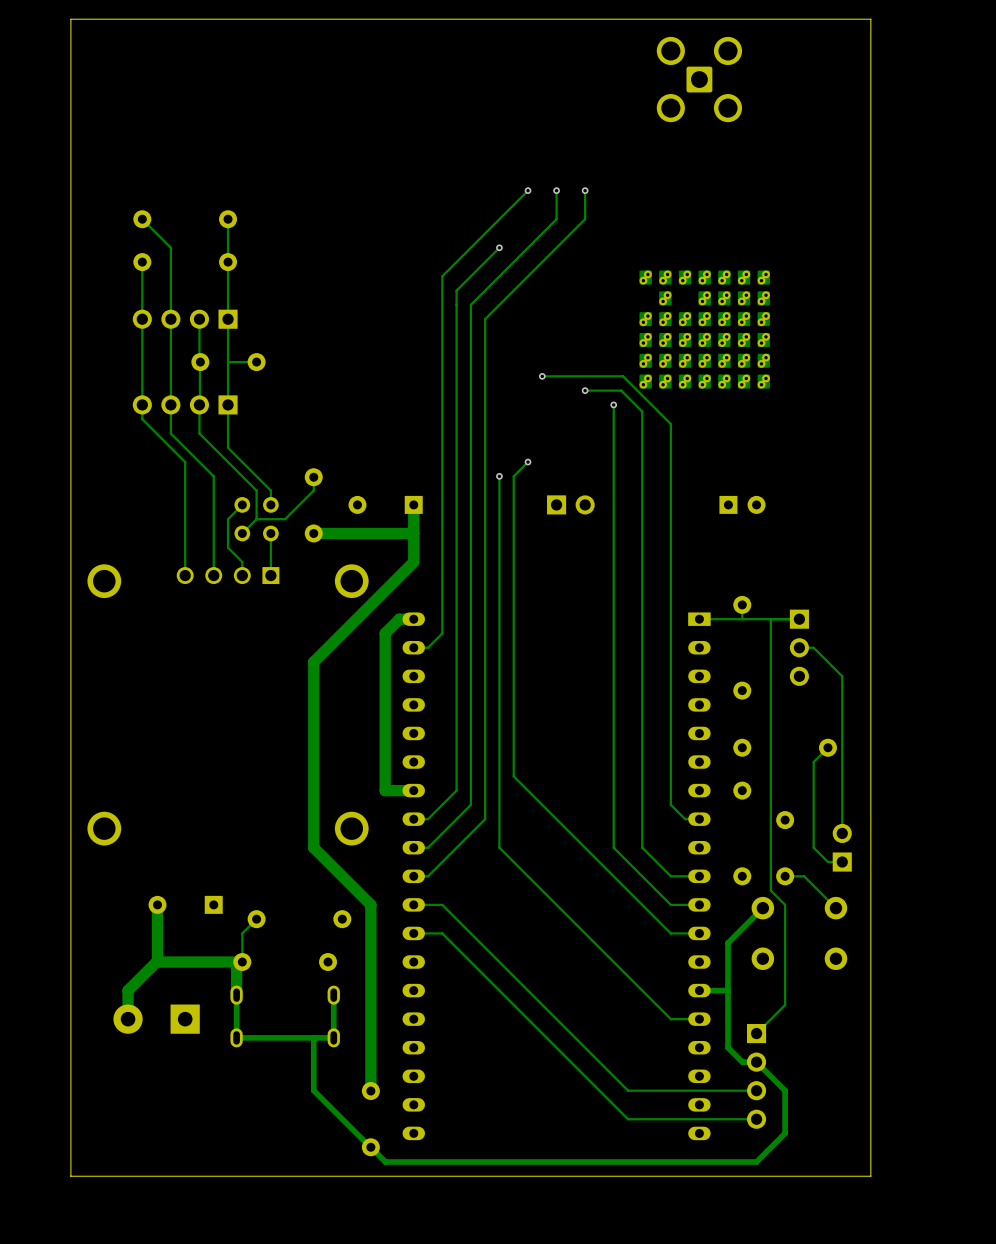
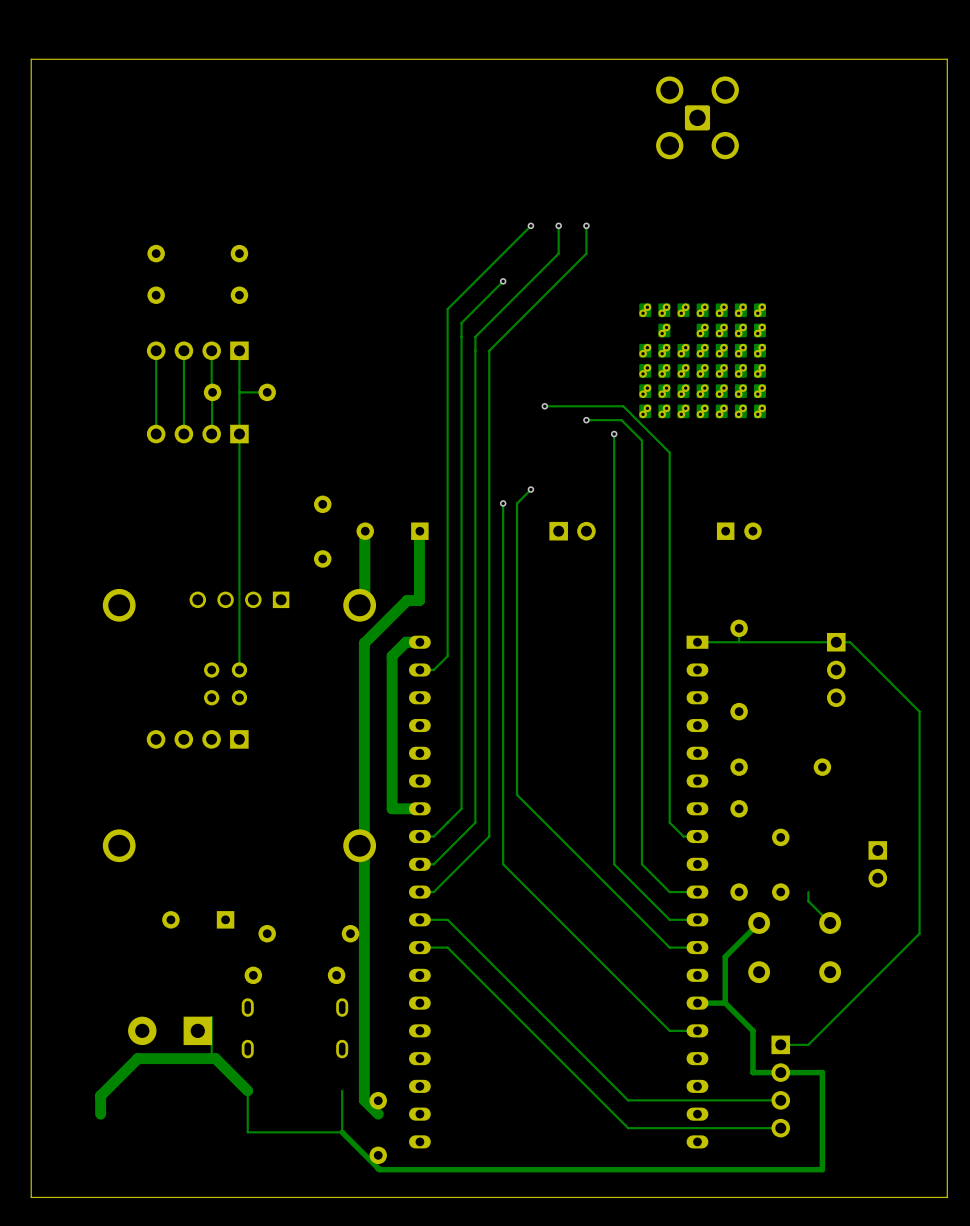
board edge: (870, 19) (870, 1176) (70, 1176) (70, 19) -> (864, 59) (947, 59) (947, 1197) (31, 1197) (31, 59) (86, 59)
track: (142, 219) (170, 247) (170, 319) -> none
track: (228, 219) (228, 319) -> none
track: (142, 262) (142, 319) -> none
track: (142, 404) (142, 419) (185, 462) (185, 575) -> none
track: (170, 404) (170, 433) (213, 476) (213, 575) -> none
track: (199, 405) (199, 433) (256, 490) (256, 519) -> none
track: (228, 447) (270, 490) (270, 504) -> (239, 475) (239, 545)
track: (313, 477) (313, 490) (285, 519) (256, 519) -> none
track: (242, 504) (228, 519) -> none
track: (413, 504) (413, 562) (313, 662) (313, 847) (370, 904) (370, 1091) -> none
track: none -> (364, 531) (364, 600)
track: none -> (419, 531) (419, 600) (407, 600) (364, 643) (364, 1100) (378, 1114)
part: (242, 519) -> none
track: (256, 519) (242, 533) -> none
part: (270, 519) -> none
track: (270, 533) (270, 575) -> none
track: (413, 533) (313, 533) -> none
track: (228, 547) (242, 562) (242, 575) -> (239, 572) (239, 669)
track: (770, 619) (770, 890) (785, 904) (785, 1004) (756, 1033) -> none
track: none -> (794, 642) (850, 642) (919, 711) (919, 933) (808, 1044) (780, 1044)
track: (799, 647) (813, 647) (842, 676) (842, 833) -> none
part position: (799, 647) -> (836, 669)
part: none -> (211, 683)
part: none -> (239, 683)
part: none -> (197, 739)
track: (827, 747) (813, 762) (813, 847) (827, 862) (842, 862) -> none
part rotation: 0° (842, 847) -> 180° (877, 864)
part position: (842, 847) -> (877, 864)
track: (785, 876) (804, 876) (813, 885) -> (808, 892) (808, 901)
track: (157, 904) (157, 961) -> none
track: (256, 919) (242, 933) (242, 962) -> none
track: (157, 961) (242, 962) -> none
track: (157, 961) (128, 990) (128, 1019) -> none
track: (242, 962) (236, 967) (236, 1037) (333, 1037) -> none
track: (727, 990) (727, 1047) (742, 1062) (756, 1062) (785, 1090) (785, 1133) (756, 1161) -> (725, 1003) (752, 1030) (752, 1072)
track: (333, 995) (333, 1037) -> (211, 1016) (211, 1058)
track: (313, 1037) (313, 1090) (385, 1161) -> (100, 1114) (100, 1095) (137, 1058) (215, 1058) (247, 1090) (247, 1132) (342, 1132) (378, 1168) (392, 1169)
track: none -> (822, 1072) (822, 1169) (752, 1169)
track: none -> (822, 1072) (753, 1072)
part position: (756, 1076) -> (780, 1086)
track: none -> (342, 1090) (342, 1133)
track: none -> (780, 1100) (752, 1100)
track: none -> (780, 1128) (752, 1128)

